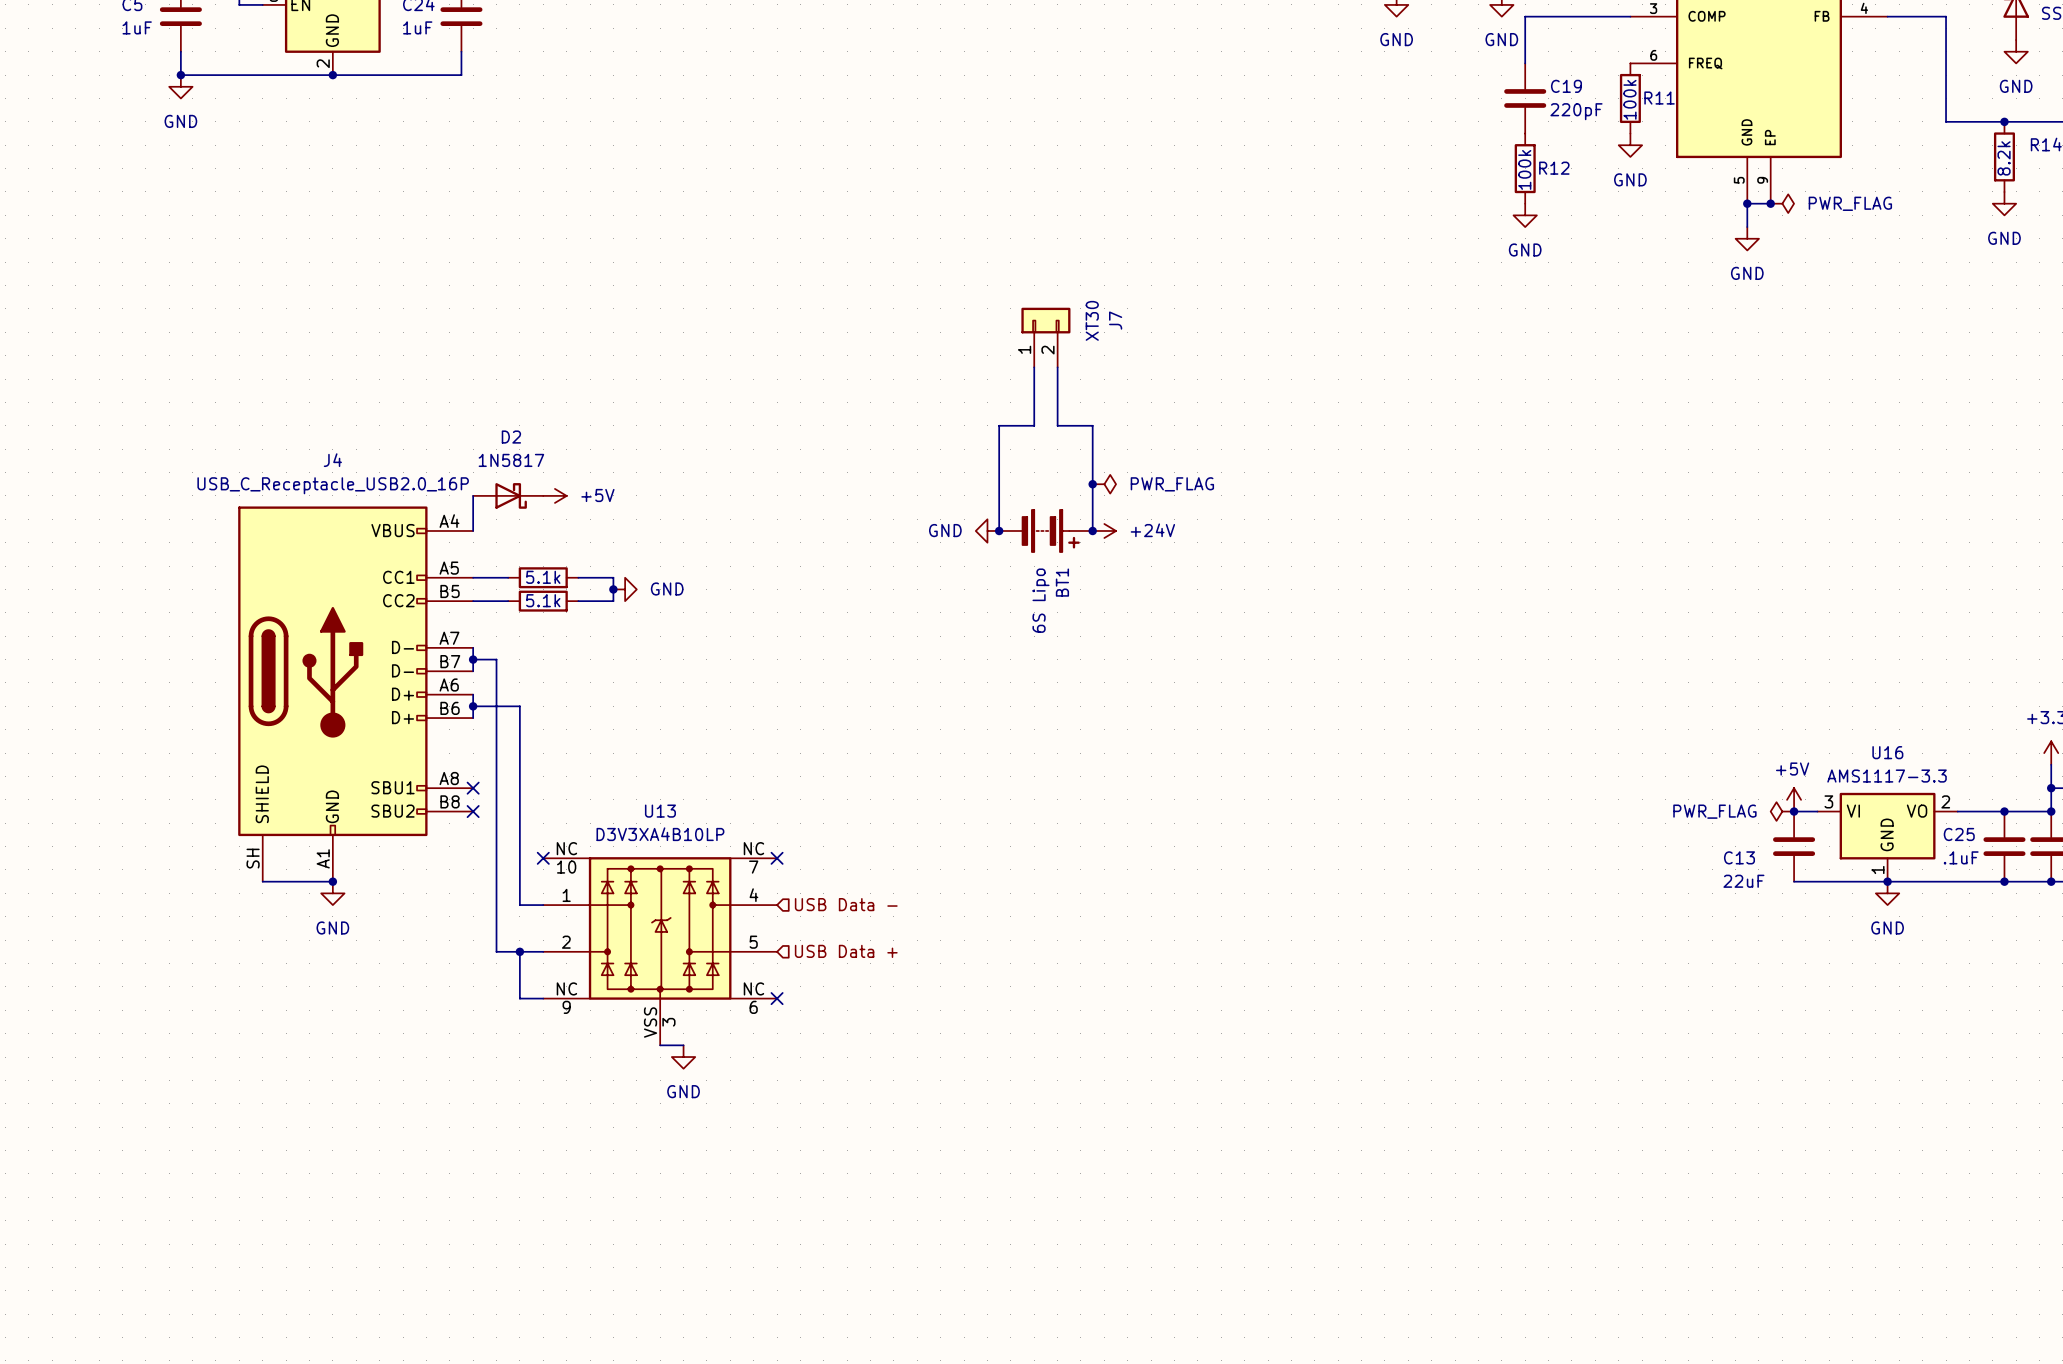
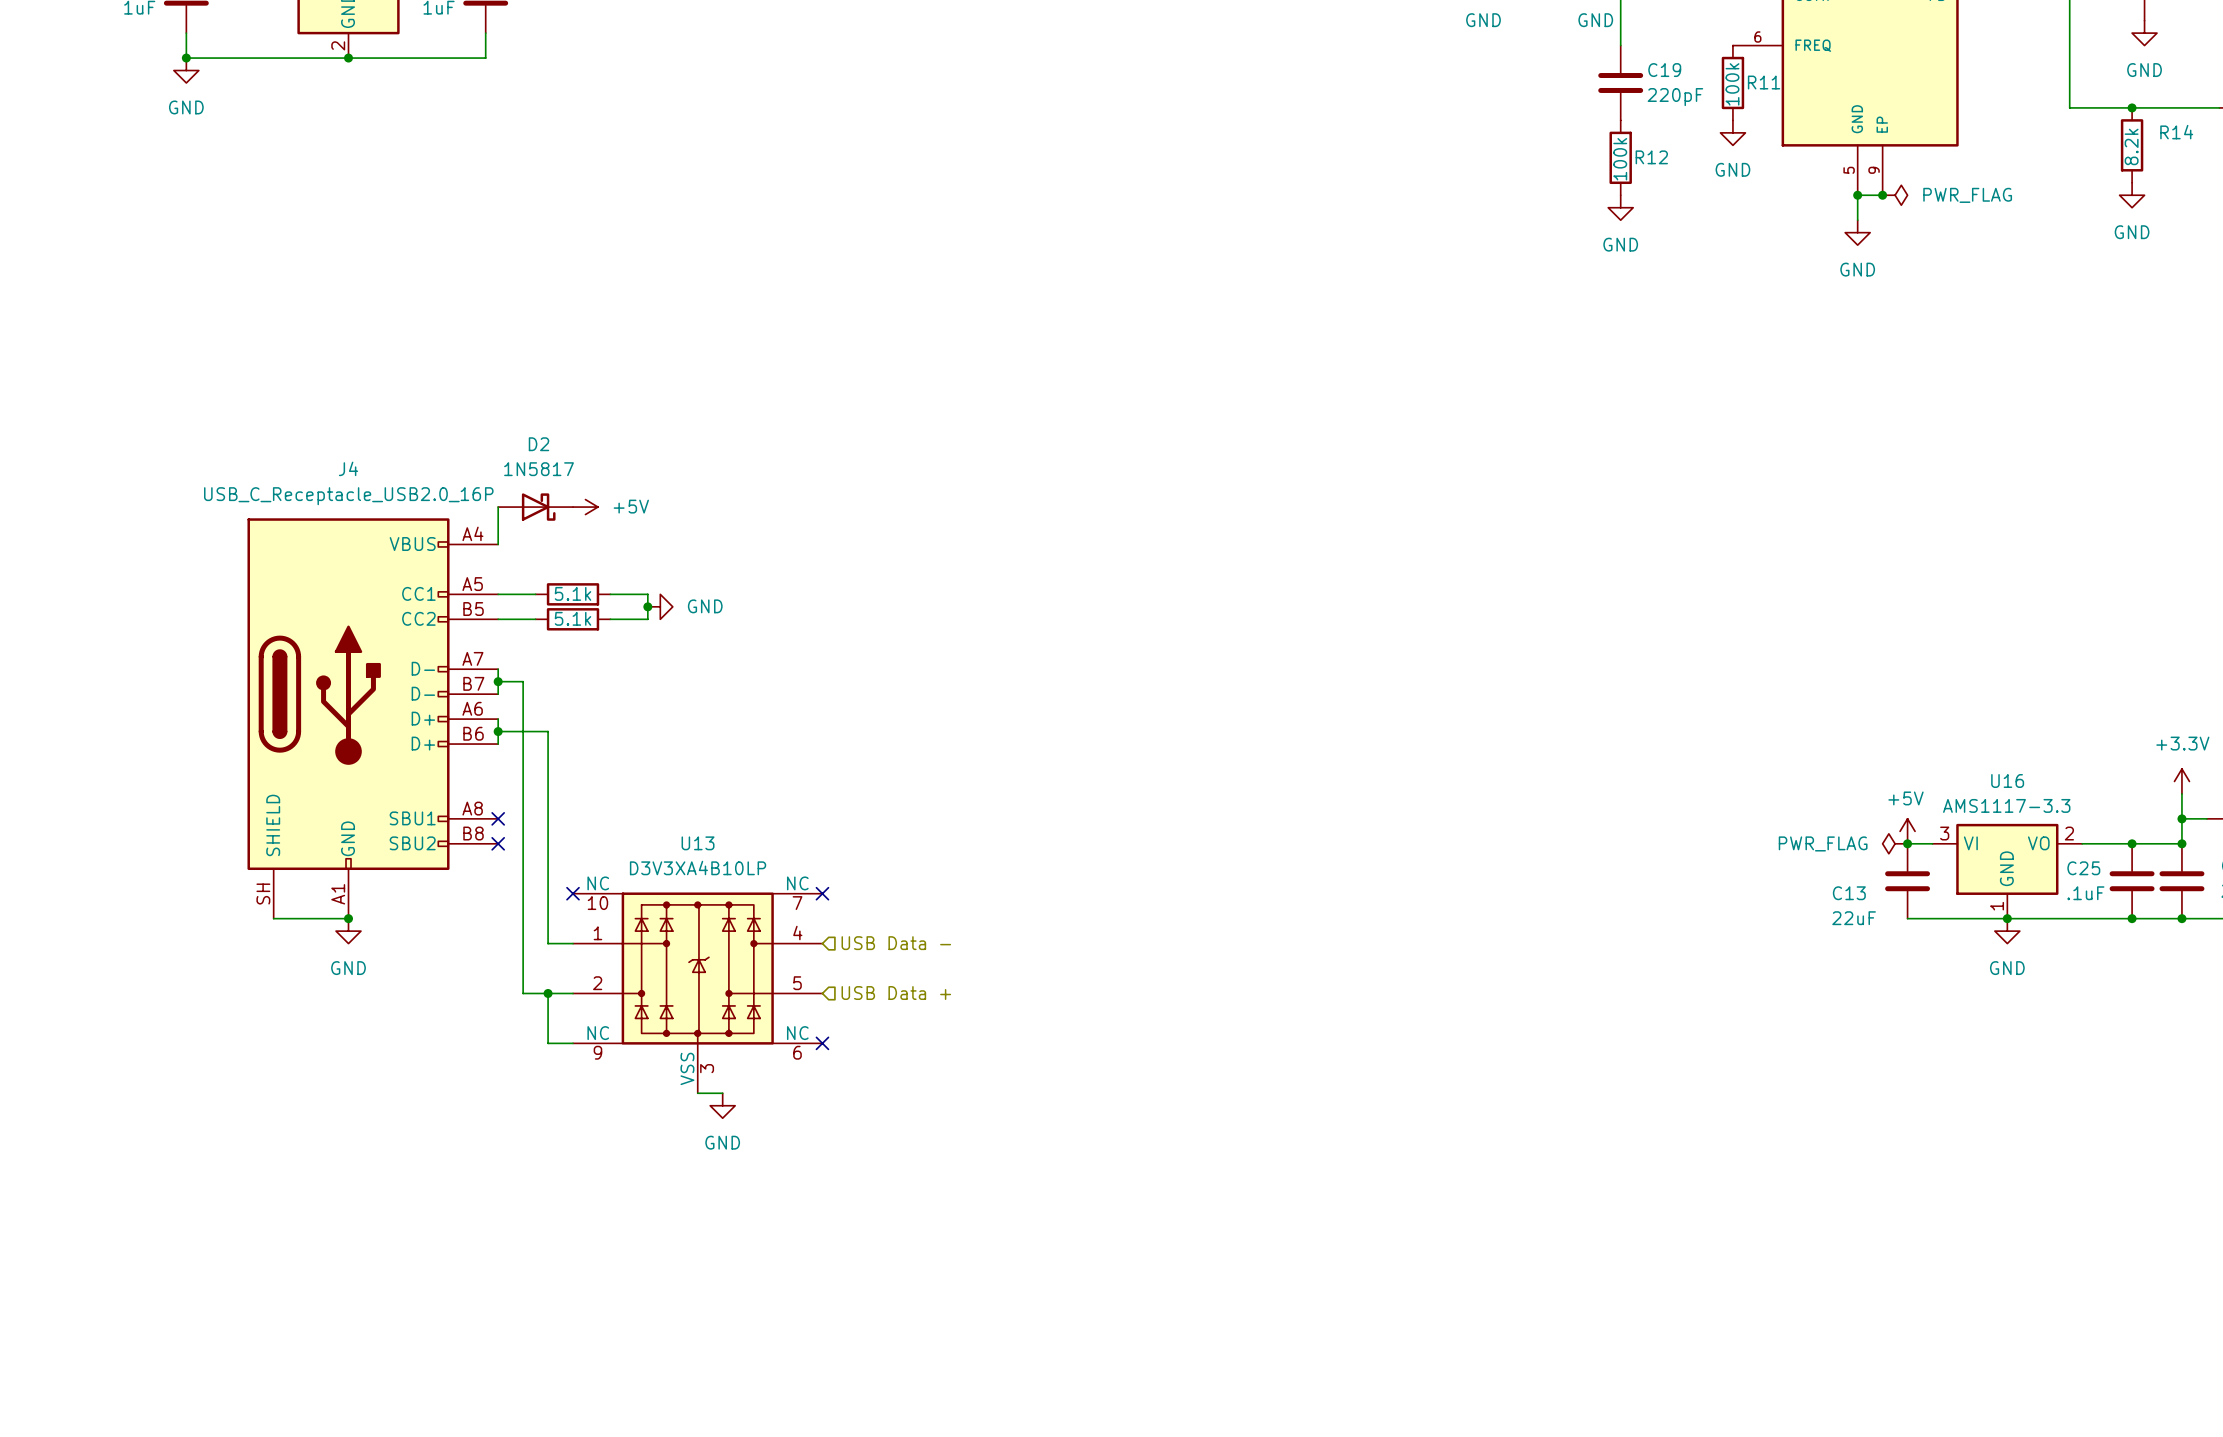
J7: XT30 (1045, 337) -> none
wire: (1034, 367) (1034, 425) (999, 425) (999, 530) -> none
wire: (1057, 367) (1057, 425) (1092, 425) (1092, 530) -> none
junction: (1092, 484) -> none
power symbol: PWR_FLAG (1104, 484) -> none
power symbol: GND (987, 530) -> none
junction: (999, 530) -> none
BT1: 6S Lipo (1045, 530) -> none
junction: (1092, 530) -> none
power symbol: +24V (1104, 530) -> none

